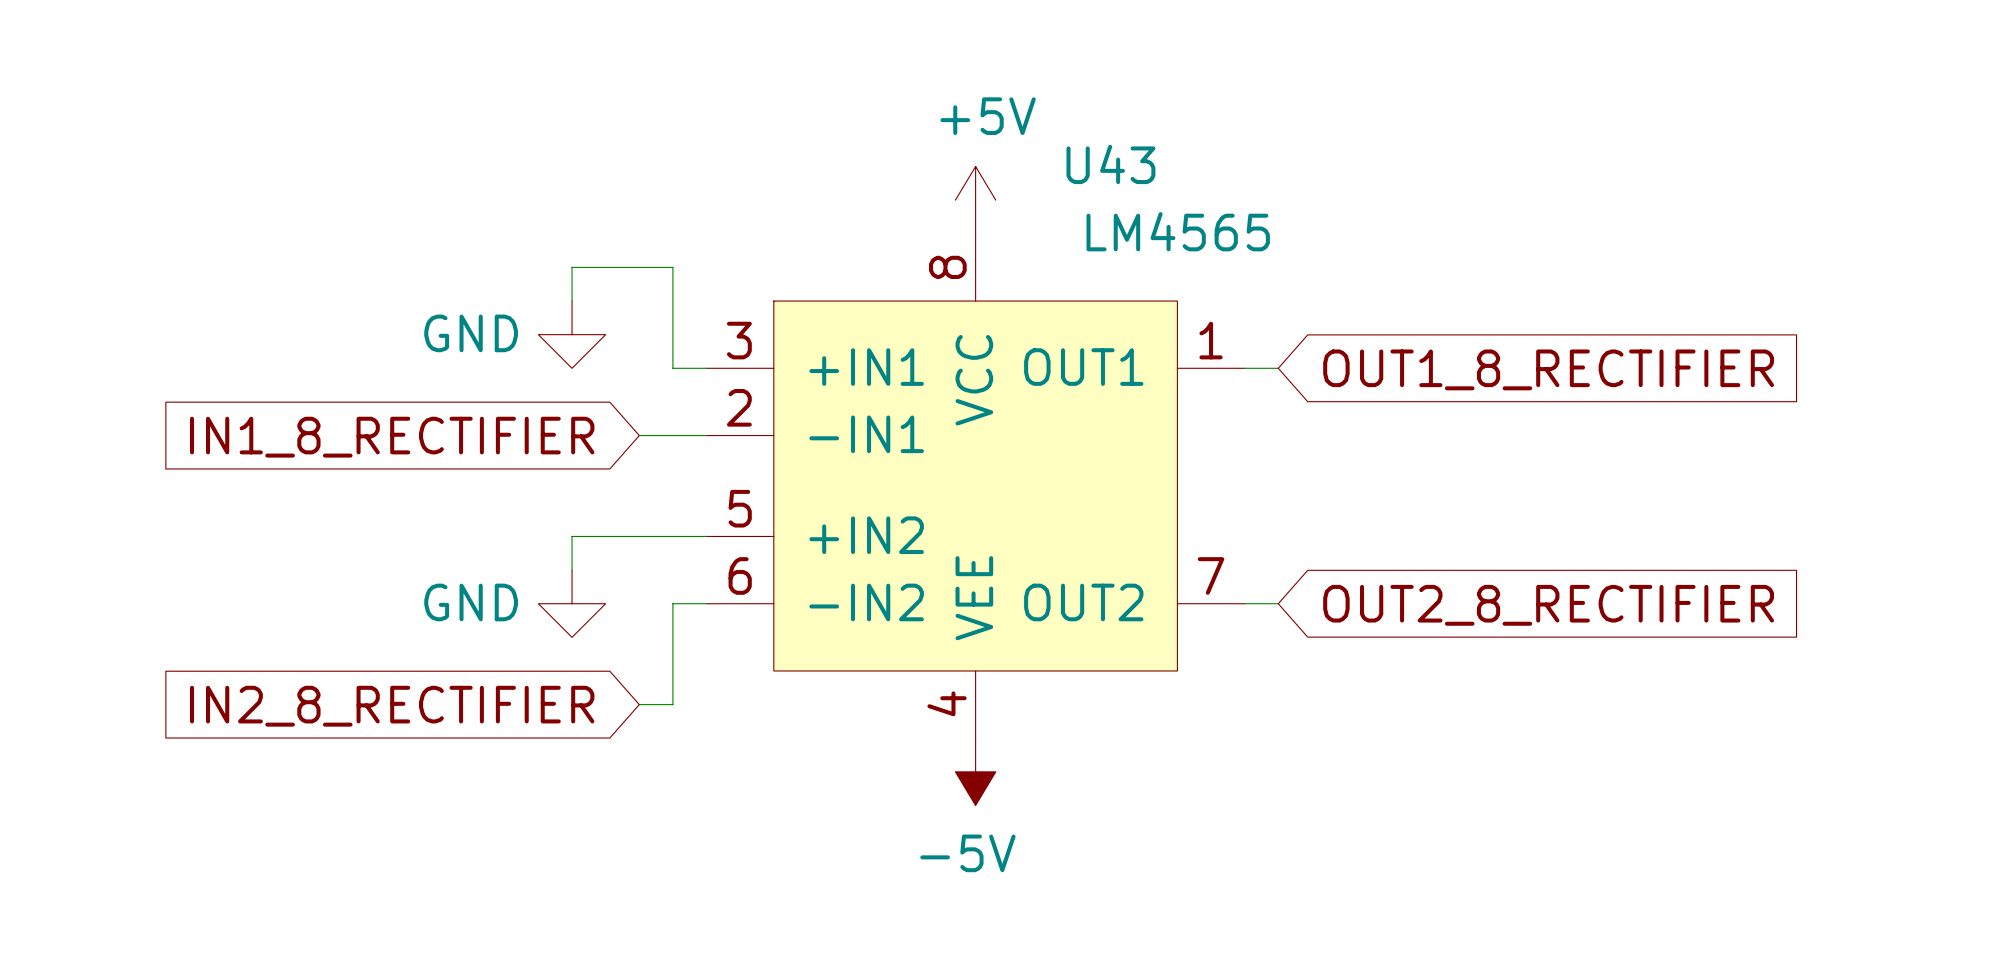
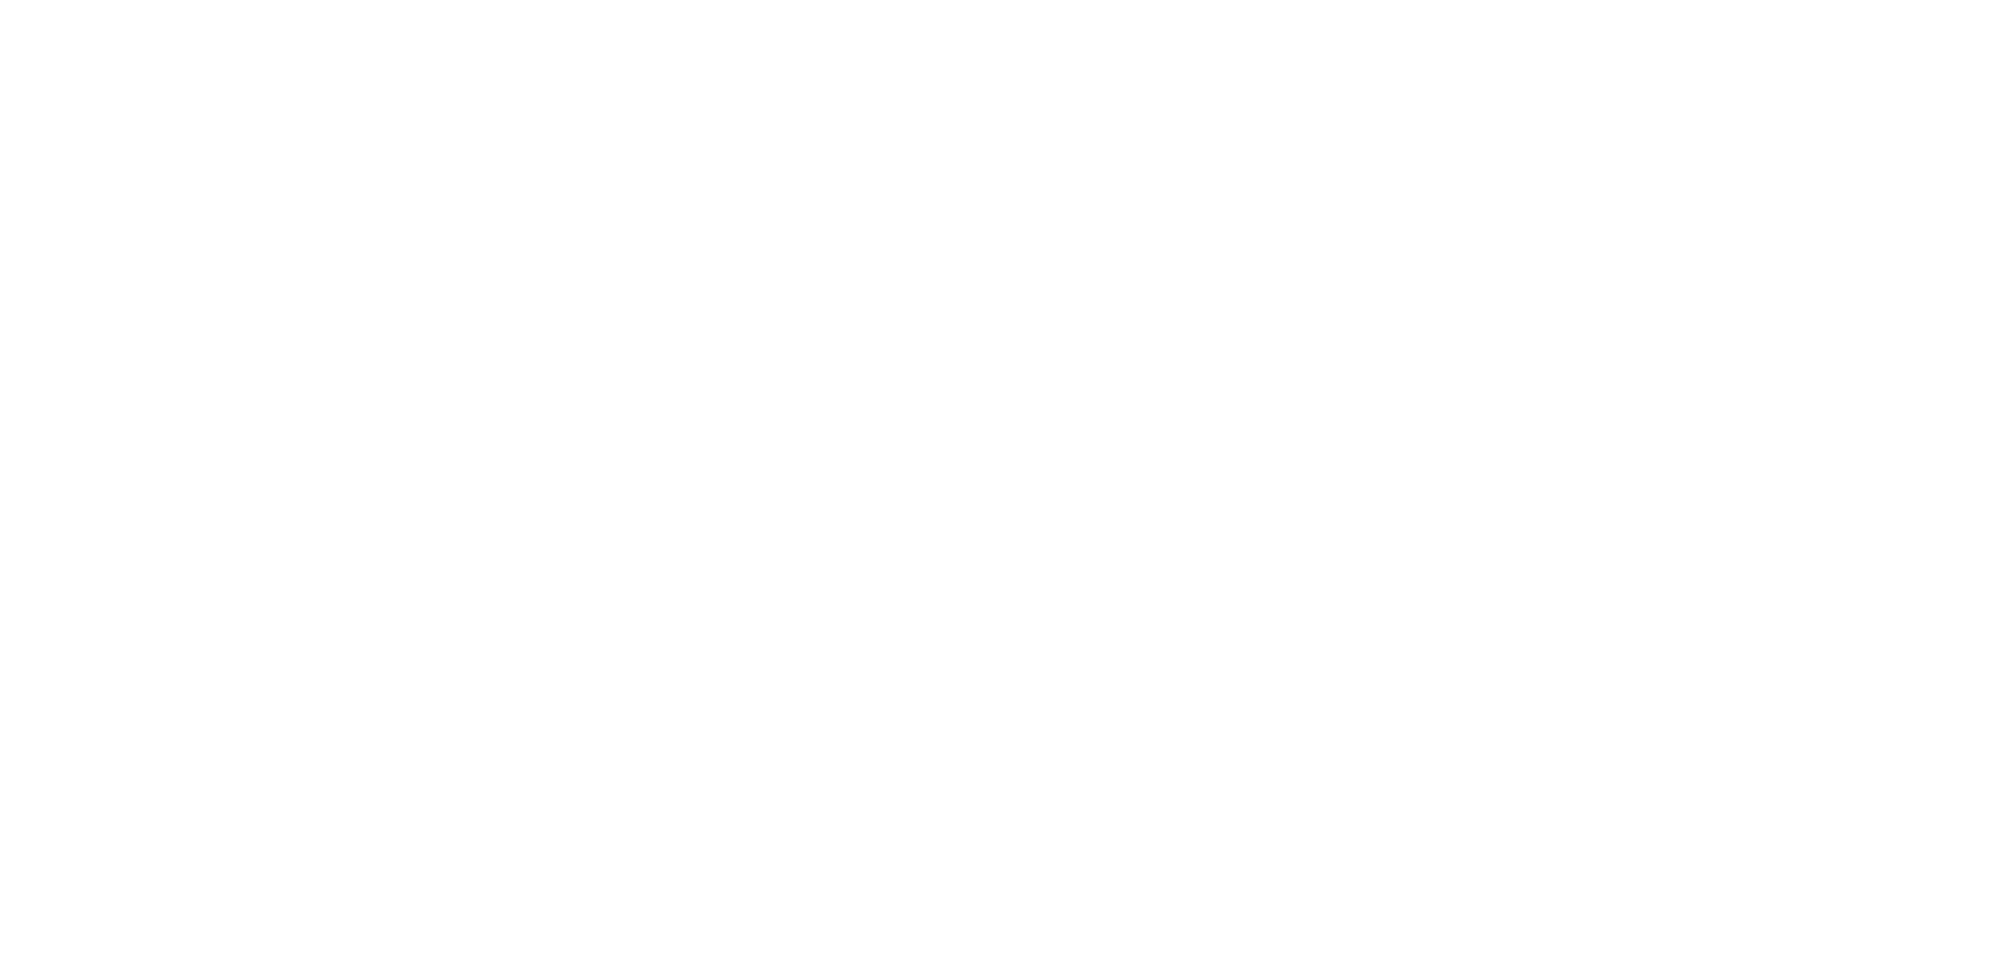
power symbol: +5V (975, 200) -> none
wire: (572, 301) (572, 267) (672, 267) (672, 368) (706, 368) -> none
power symbol: GND (572, 334) -> none
wire: (1244, 368) (1278, 368) -> none
global label: OUT1_8_RECTIFIER (1548, 369) -> none
wire: (639, 435) (706, 435) -> none
global label: IN1_8_RECTIFIER (392, 437) -> none
U43: LM4565 (975, 486) -> none
wire: (706, 536) (572, 536) (572, 570) -> none
power symbol: GND (572, 603) -> none
wire: (706, 603) (672, 603) (672, 704) (639, 704) -> none
wire: (1244, 603) (1278, 603) -> none
global label: OUT2_8_RECTIFIER (1548, 605) -> none
global label: IN2_8_RECTIFIER (392, 706) -> none
power symbol: -5V (975, 771) -> none

